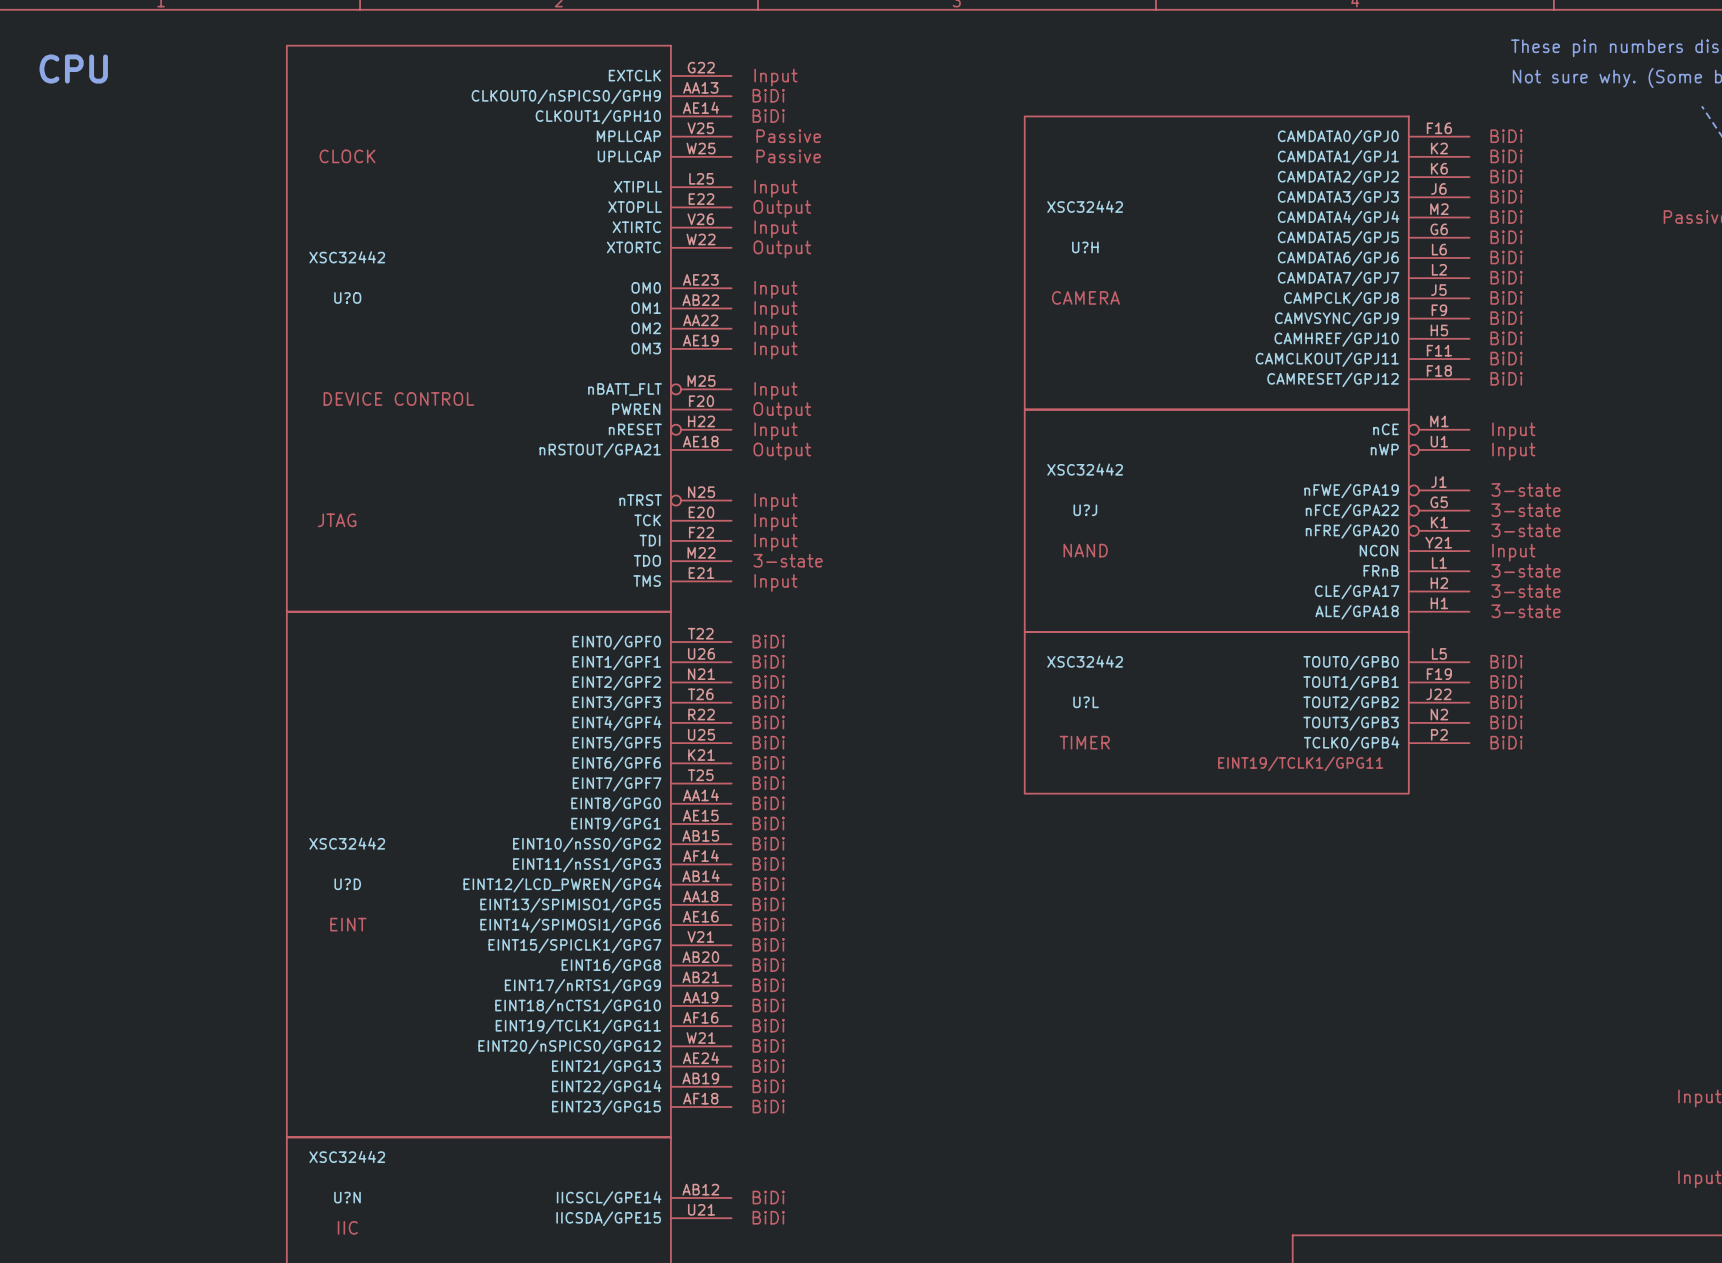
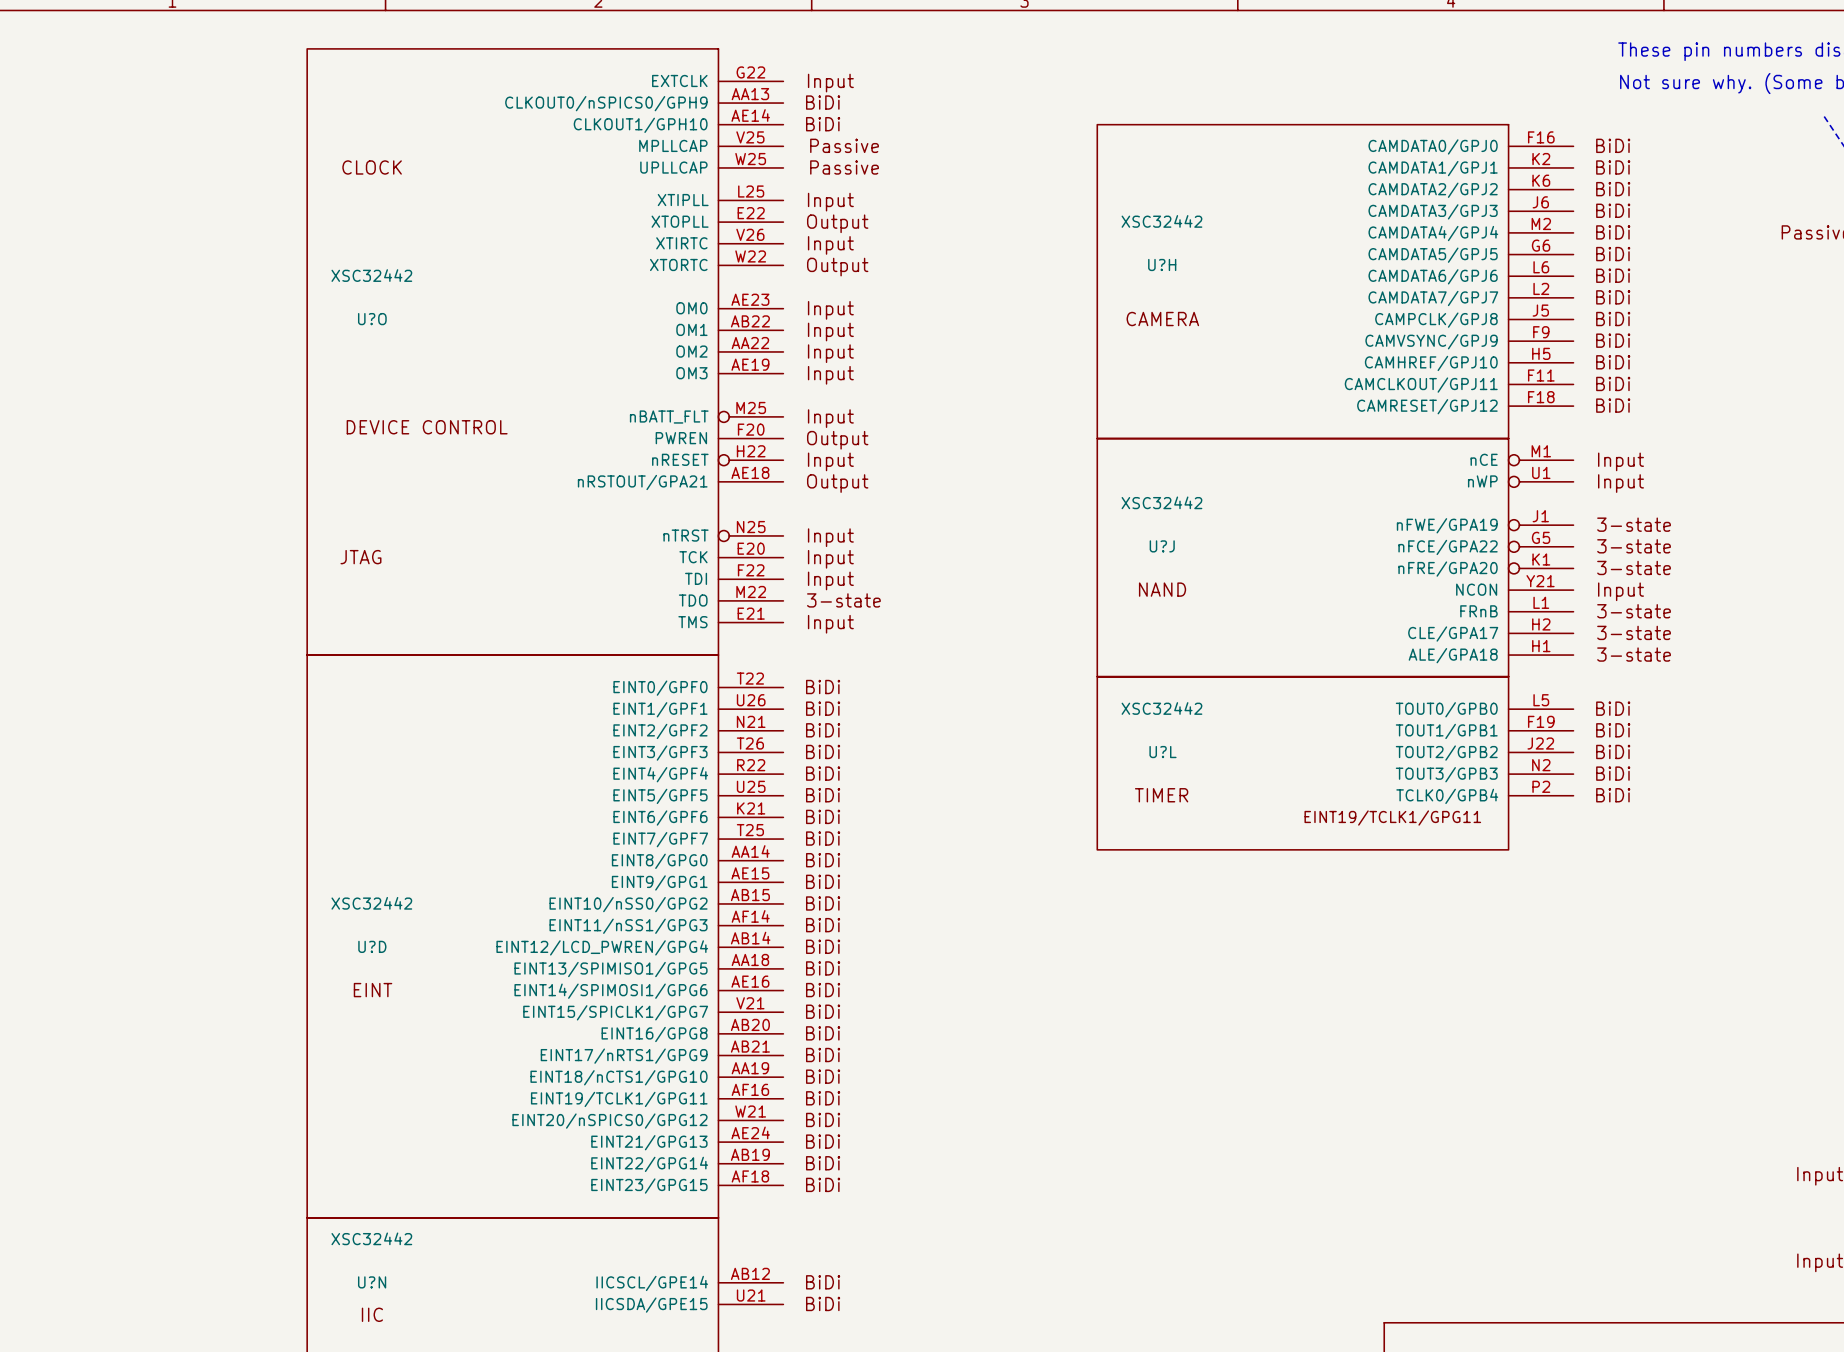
text: CPU (73, 69) -> none

